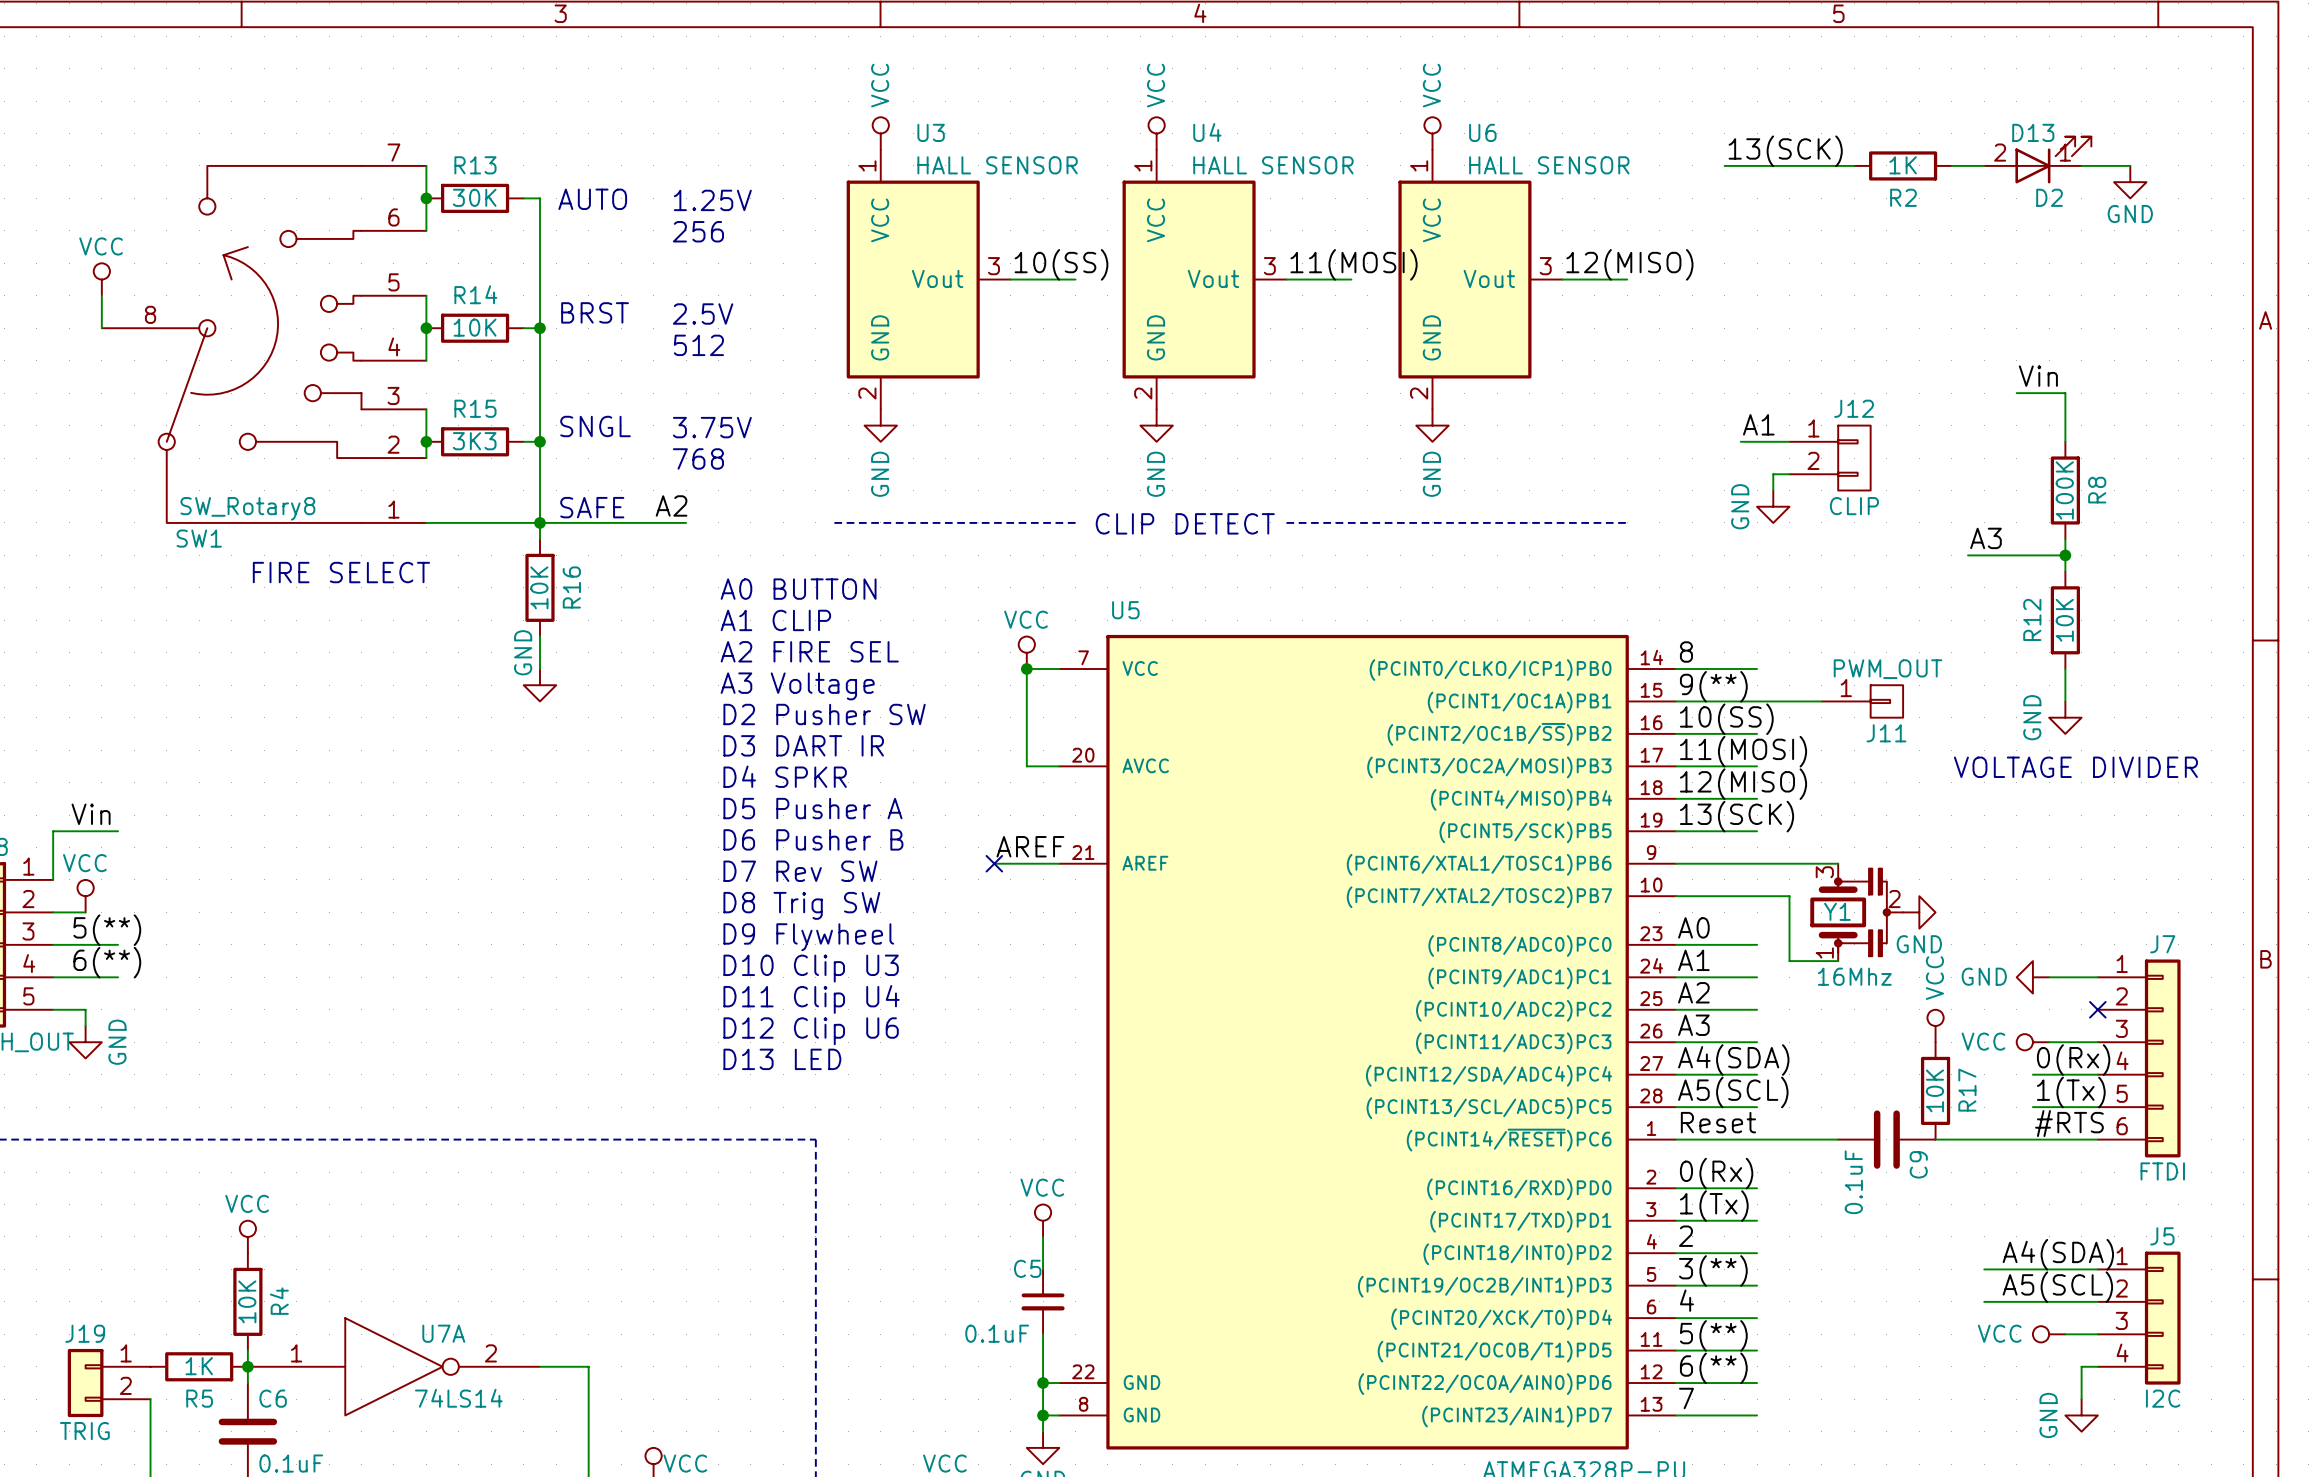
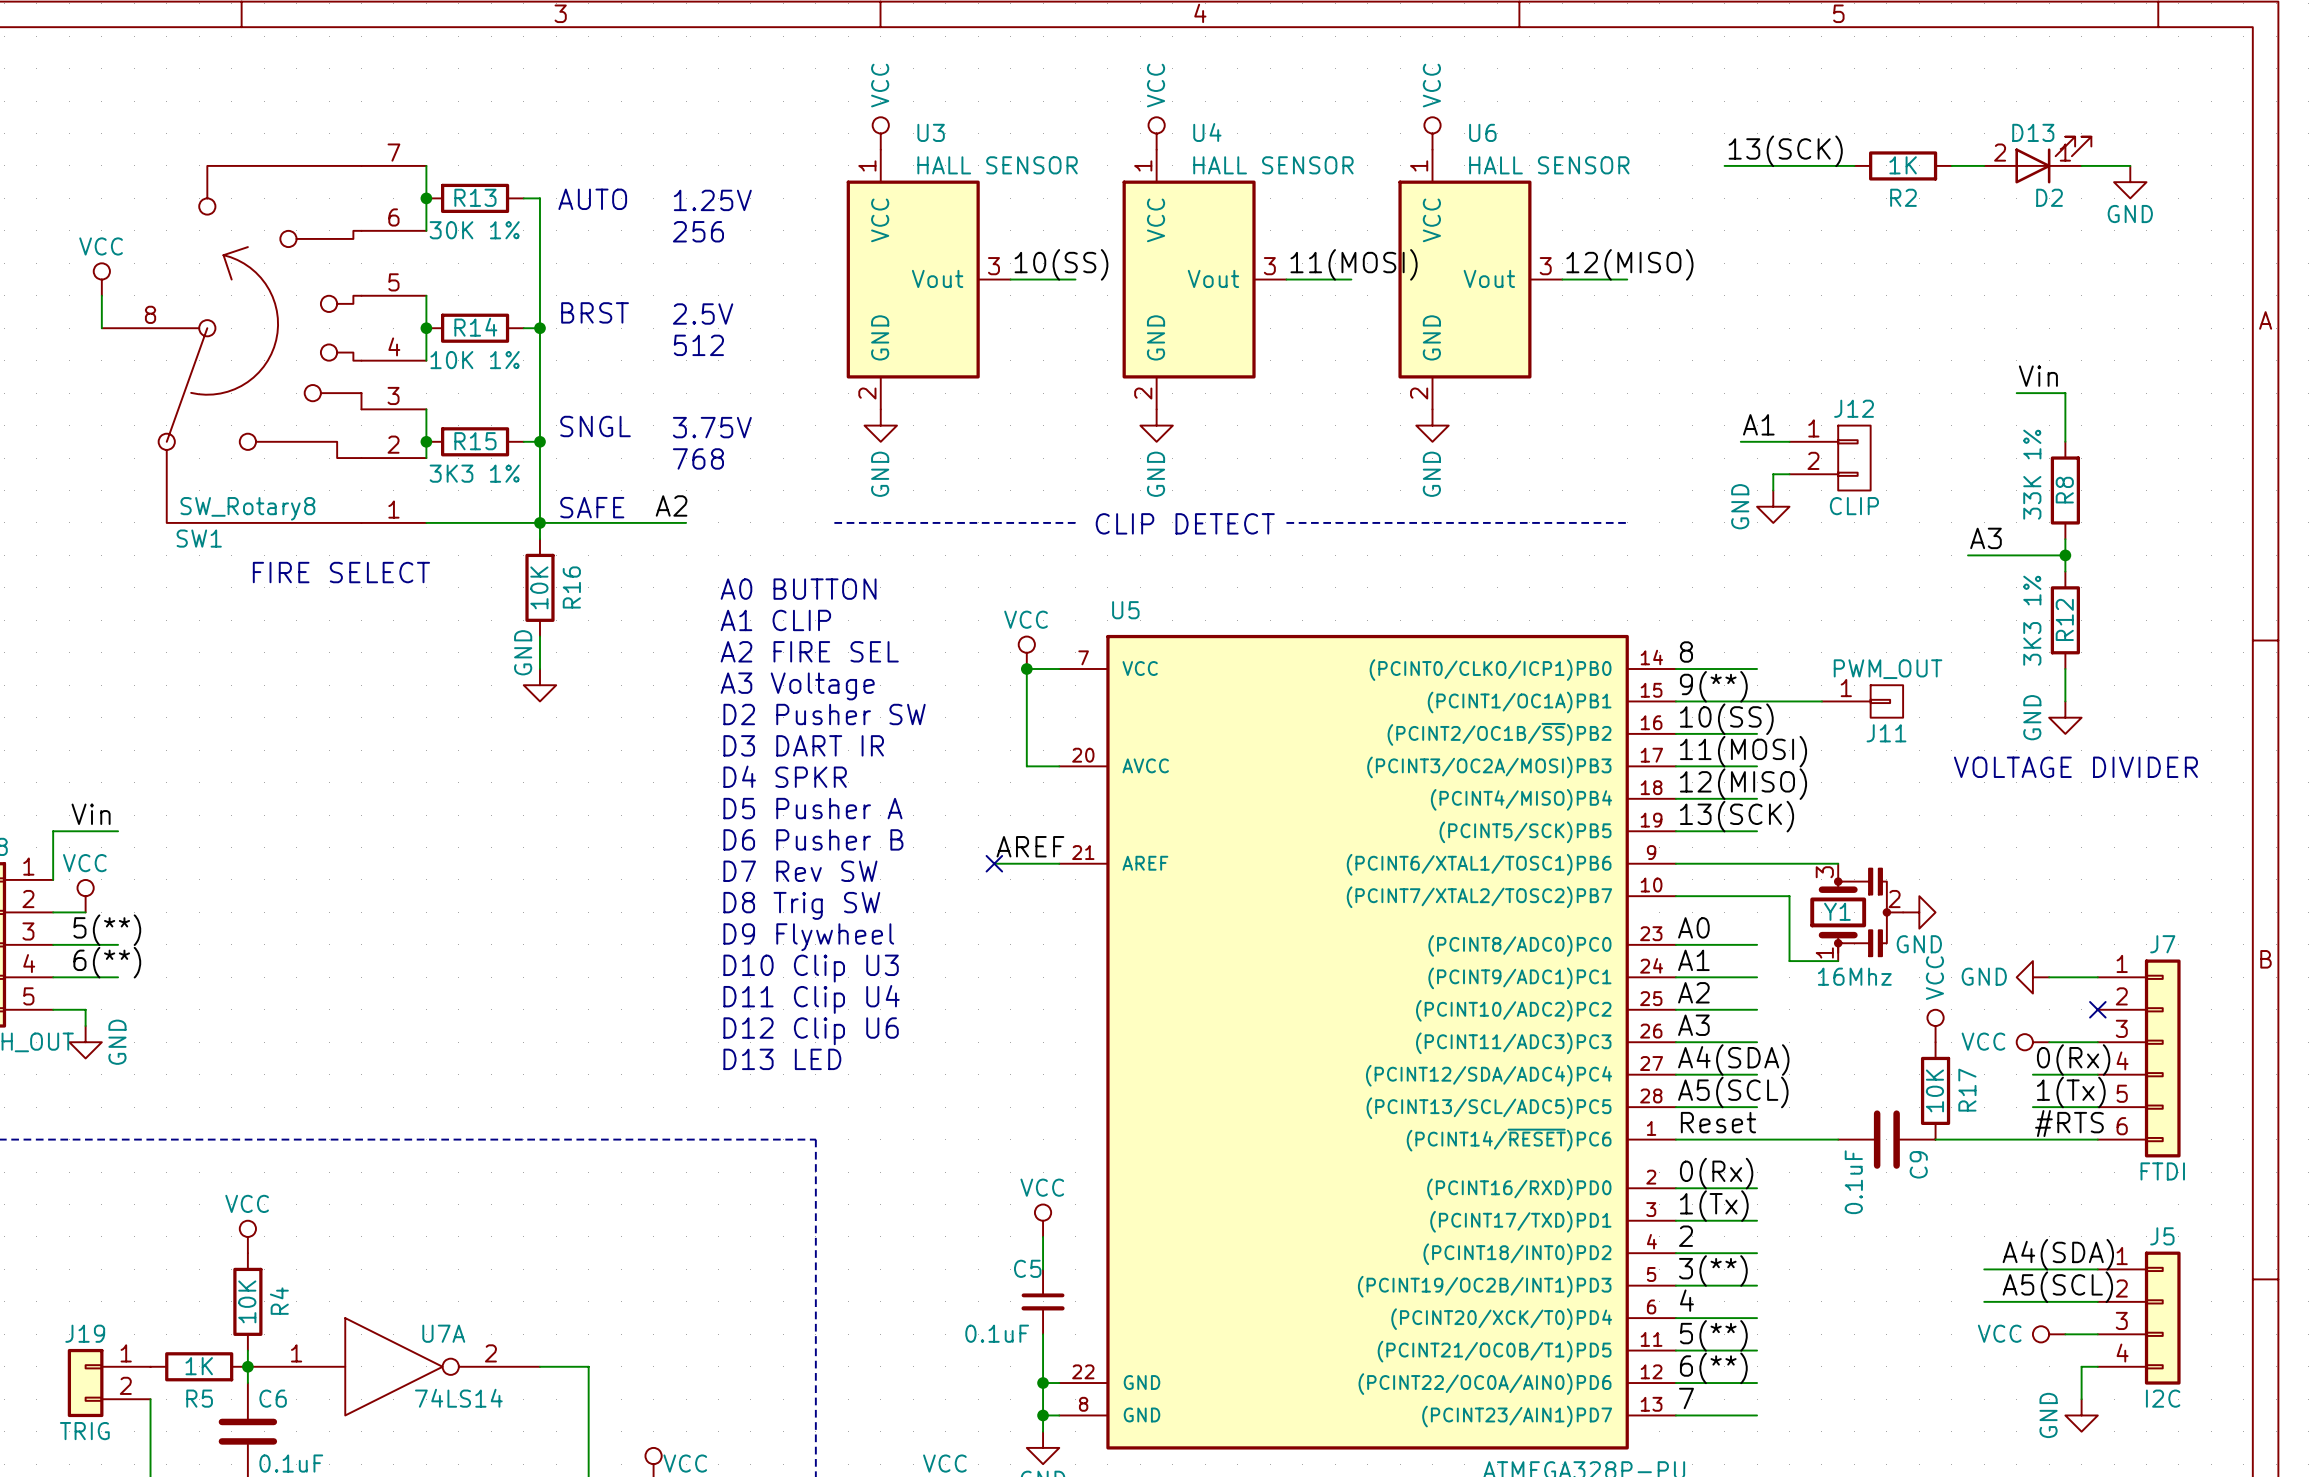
R13 name position: R13 (475, 165) -> R13 (475, 197)
R13 value: 30K (474, 197) -> 30K 1% (474, 230)
R14 name position: R14 (475, 294) -> R14 (475, 327)
R14 value: 10K (475, 327) -> 10K 1% (475, 360)
R15 name position: R15 (475, 408) -> R15 (475, 441)
R15 value: 3K3 (474, 441) -> 3K3 1% (474, 473)
R8 value: 100K (2064, 490) -> 33K 1% (2032, 474)
R8 name position: R8 (2097, 490) -> R8 (2064, 490)
R12 name position: R12 (2032, 619) -> R12 (2064, 619)
R12 value: 10K (2064, 620) -> 3K3 1% (2032, 620)

